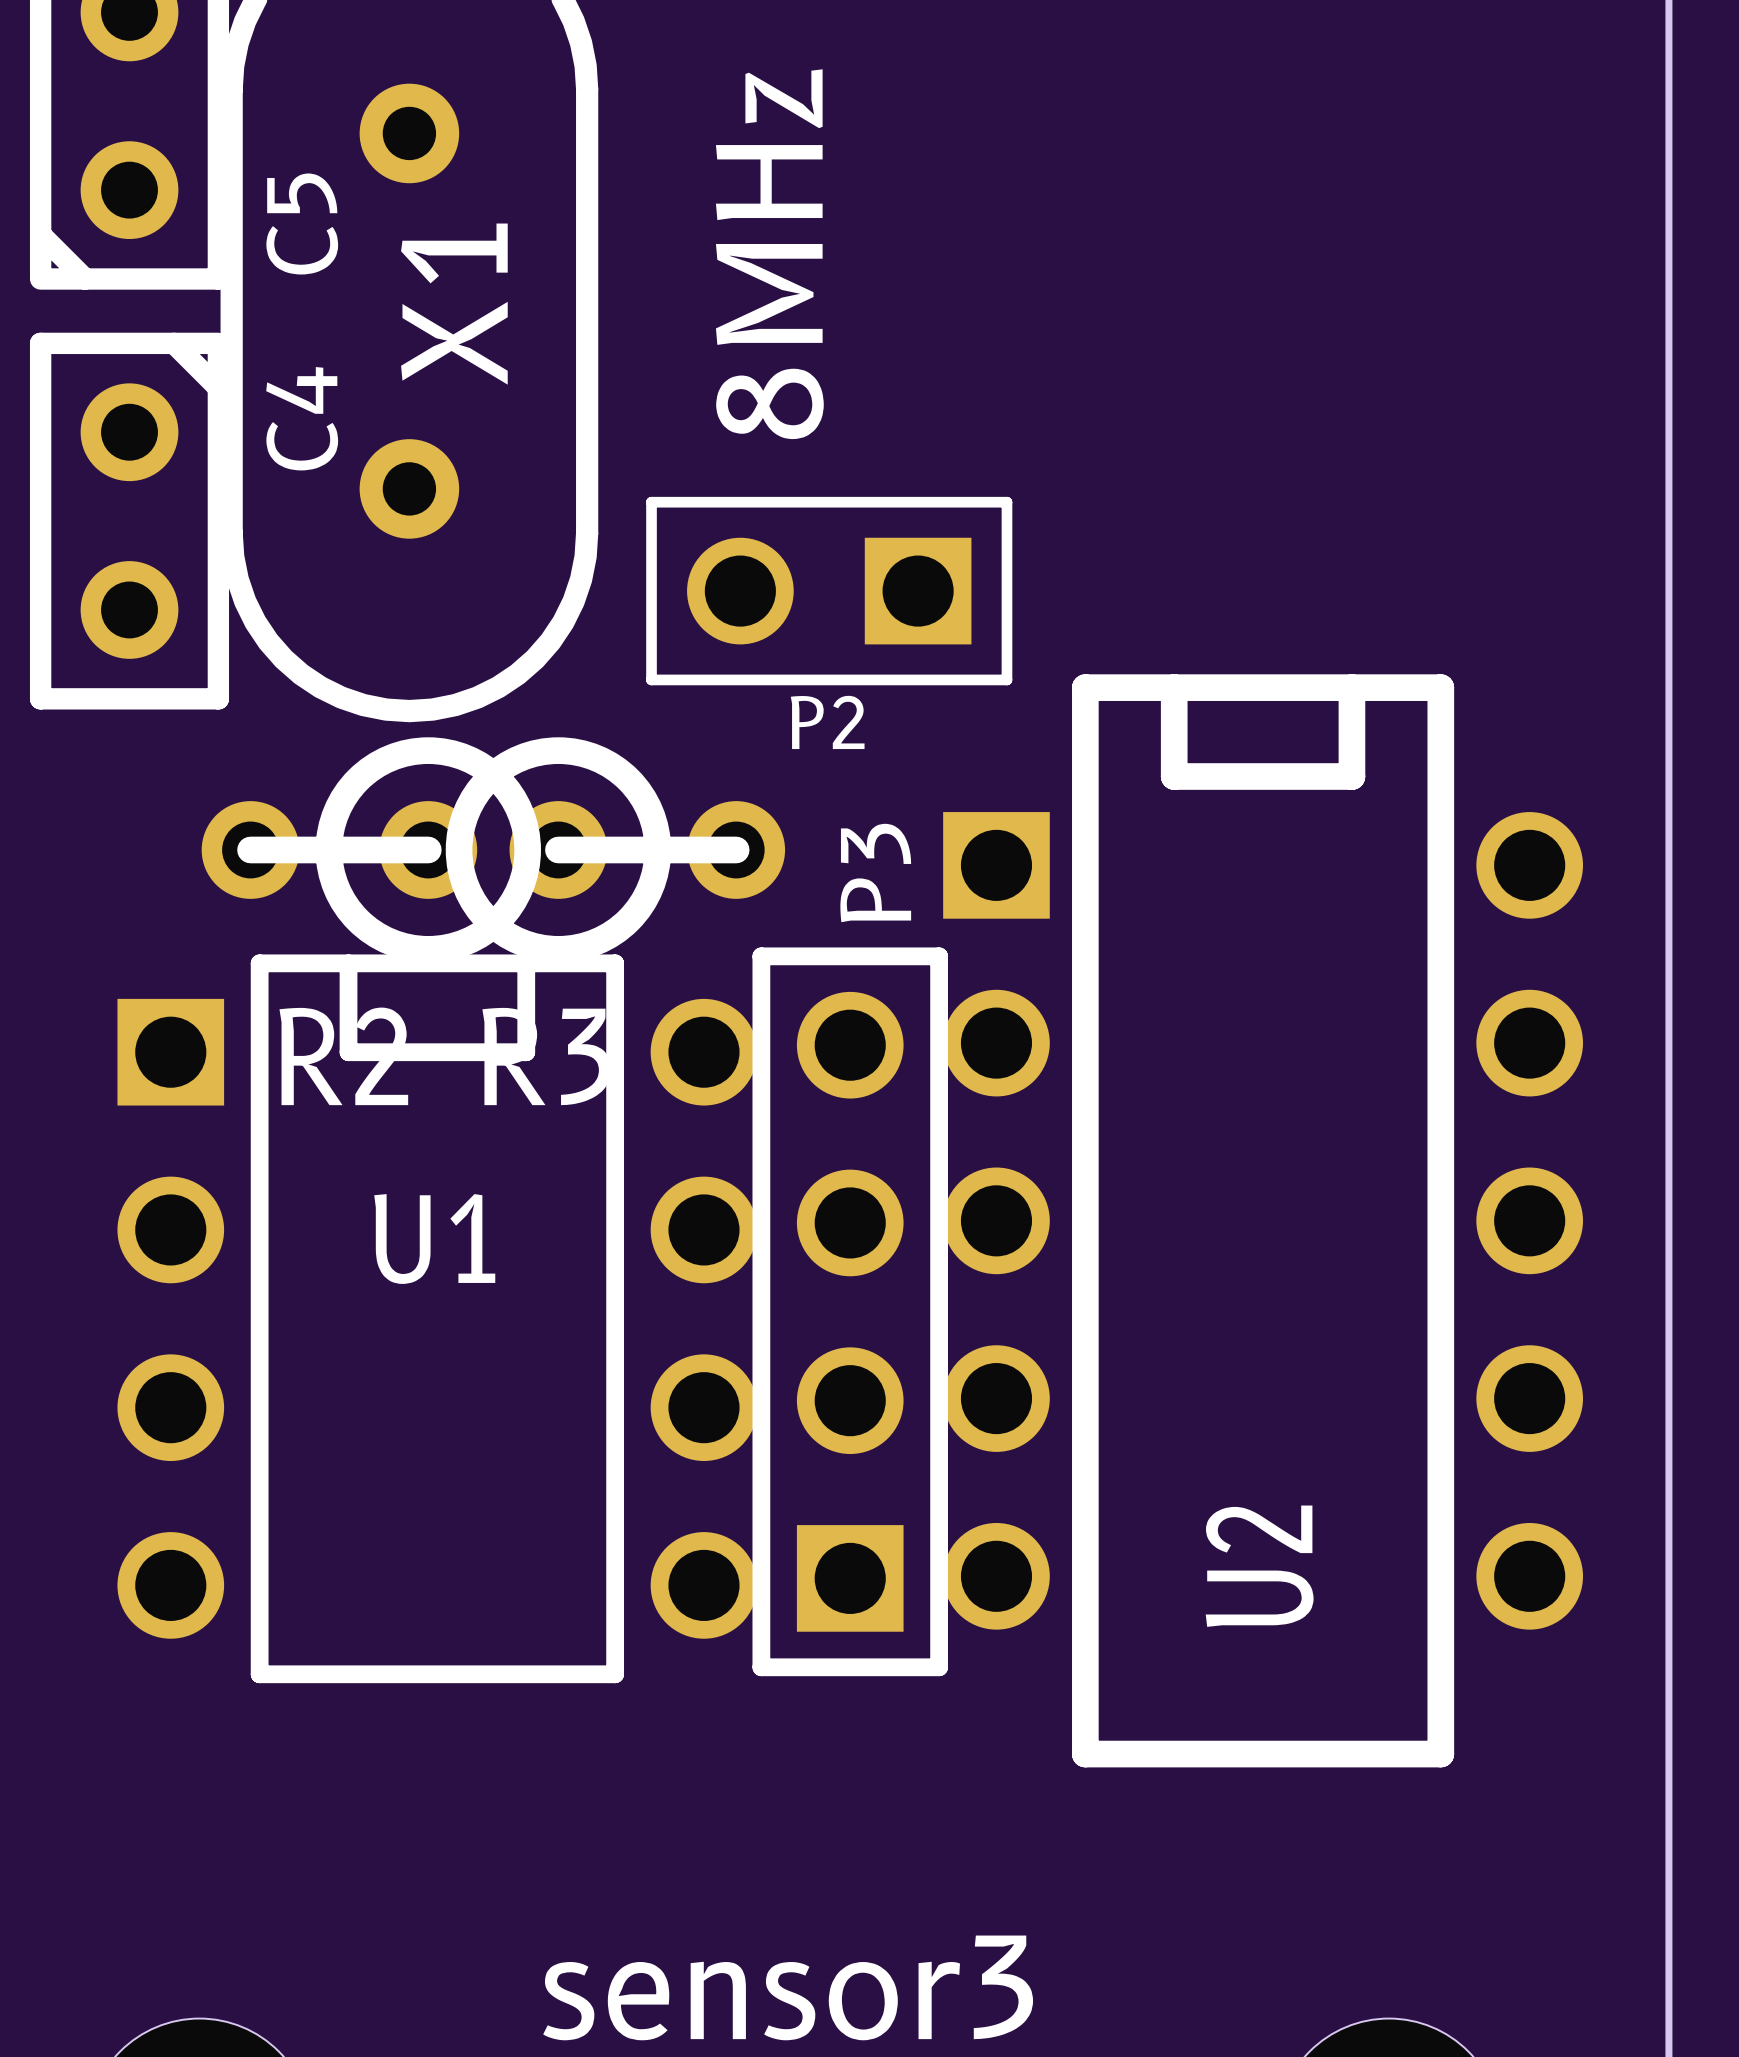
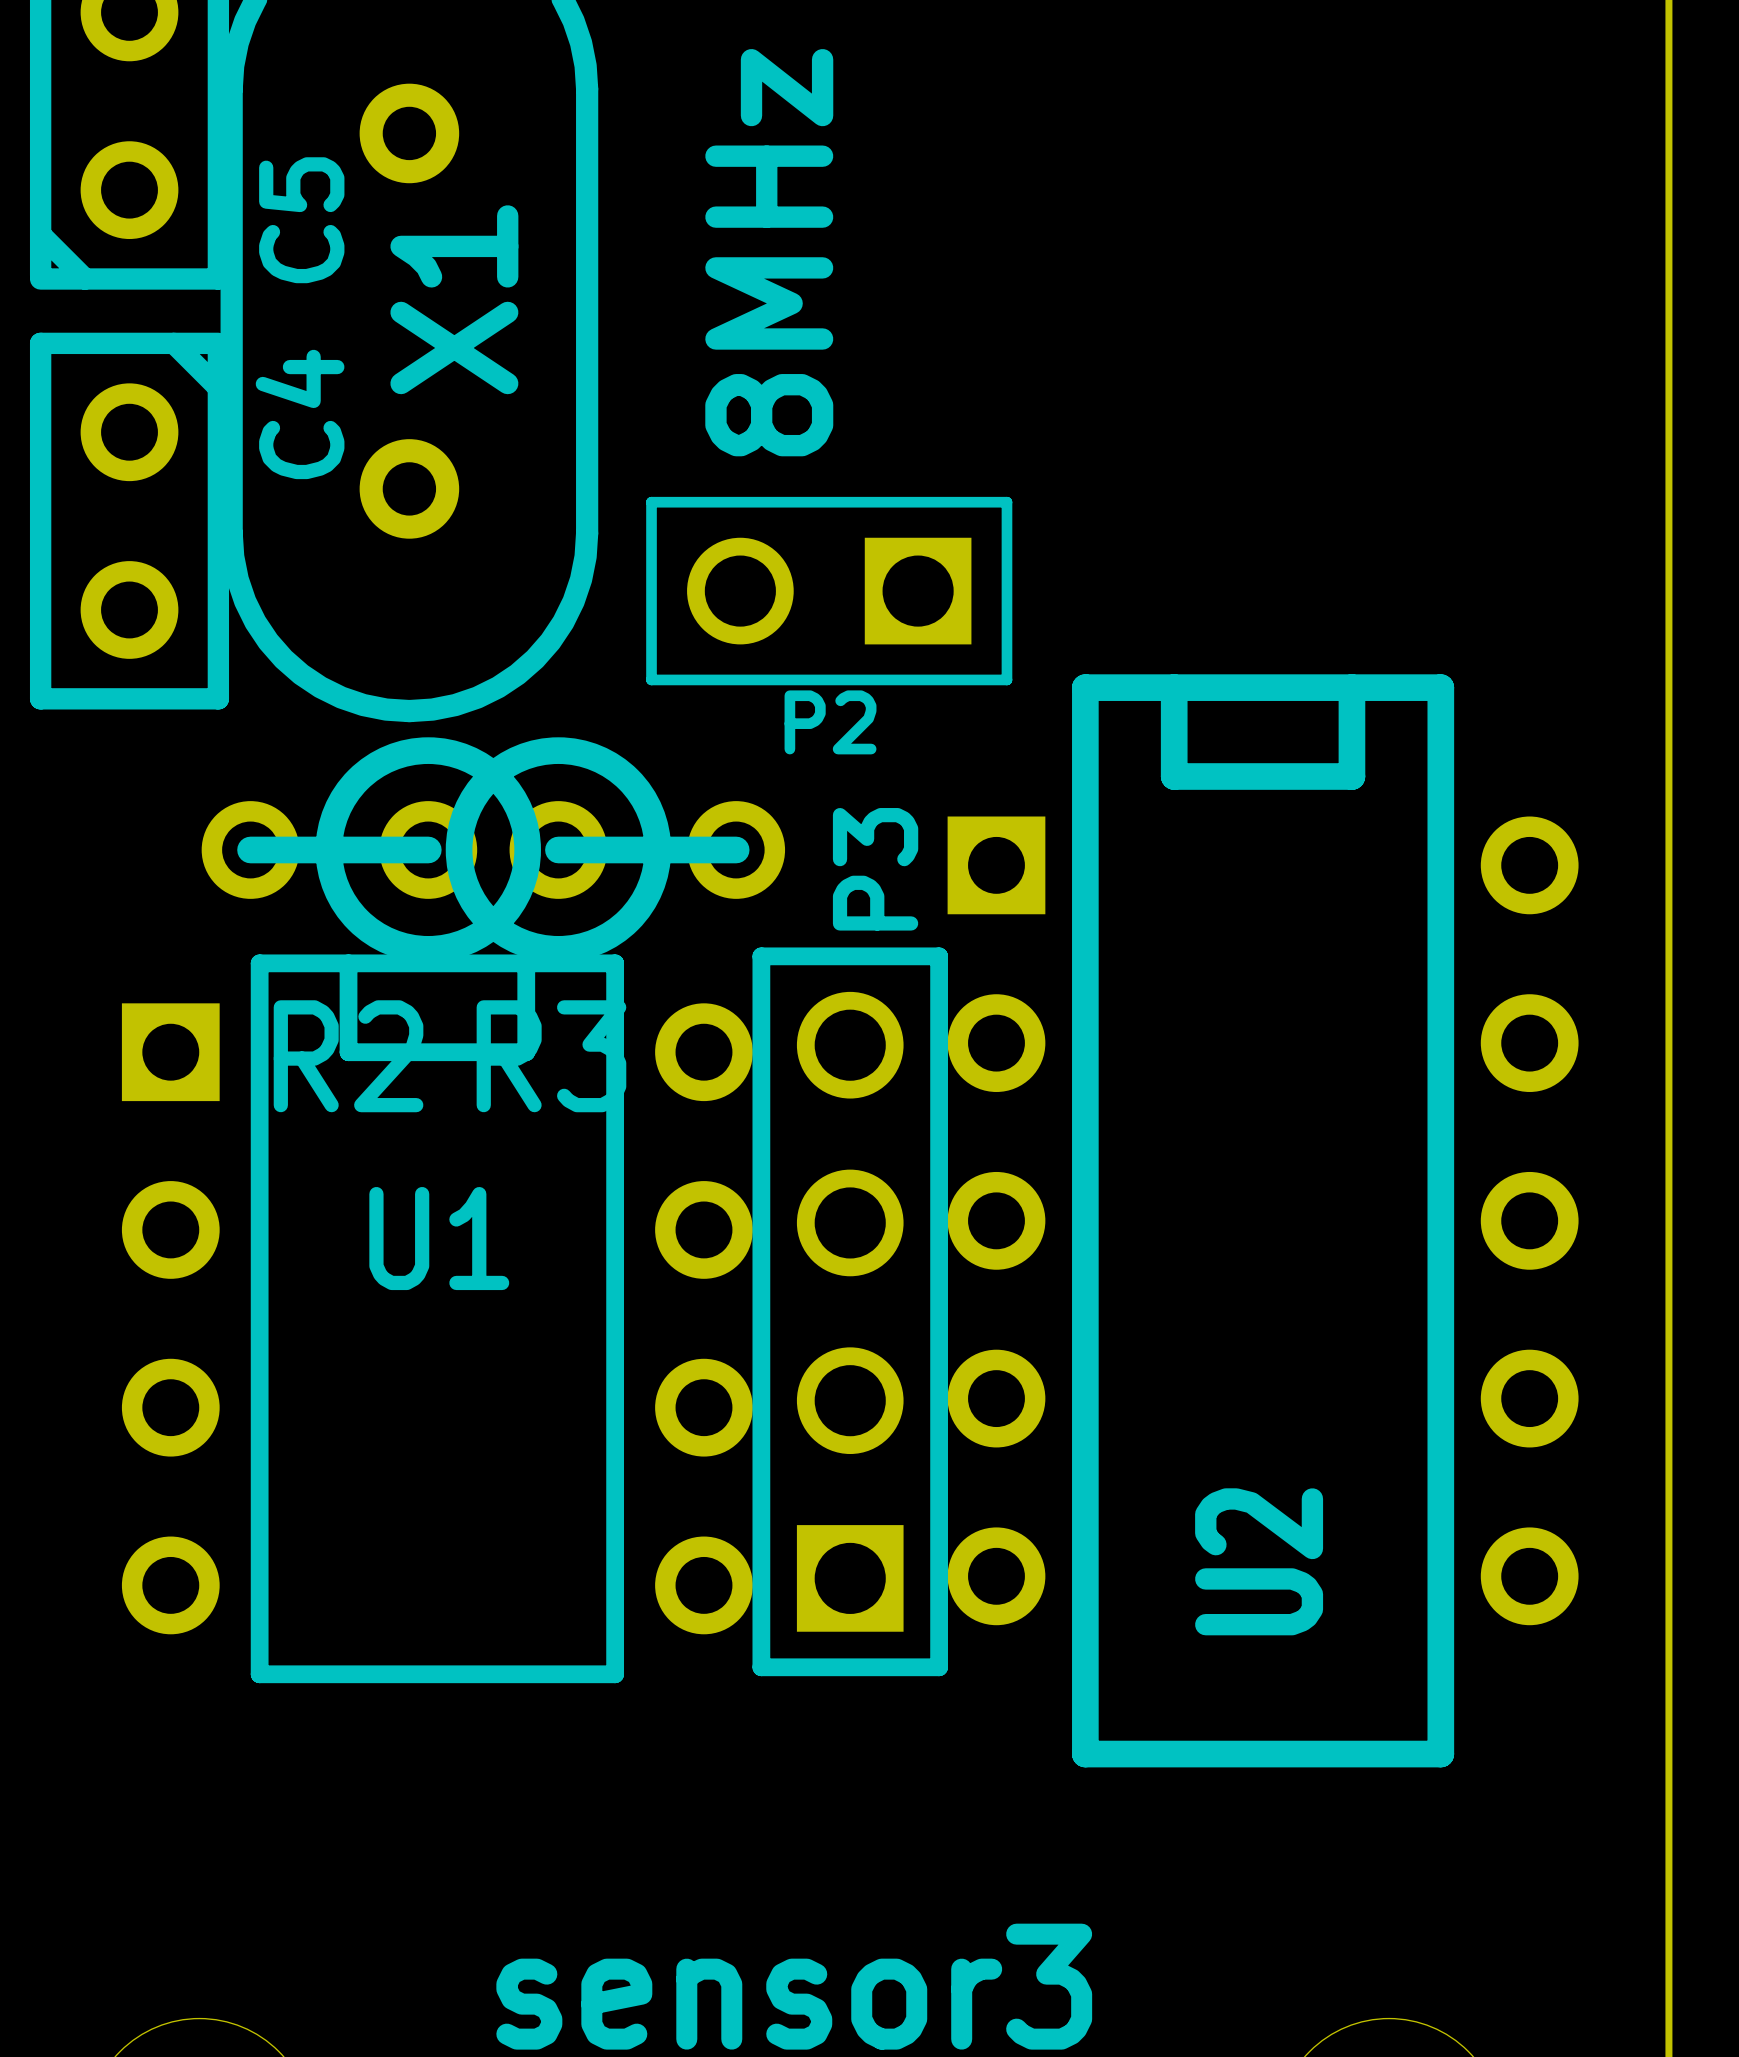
U2 footprint: [943, 674, 1584, 1768] -> [947, 674, 1579, 1768]
U1 footprint: [117, 954, 758, 1684] -> [121, 954, 753, 1684]

